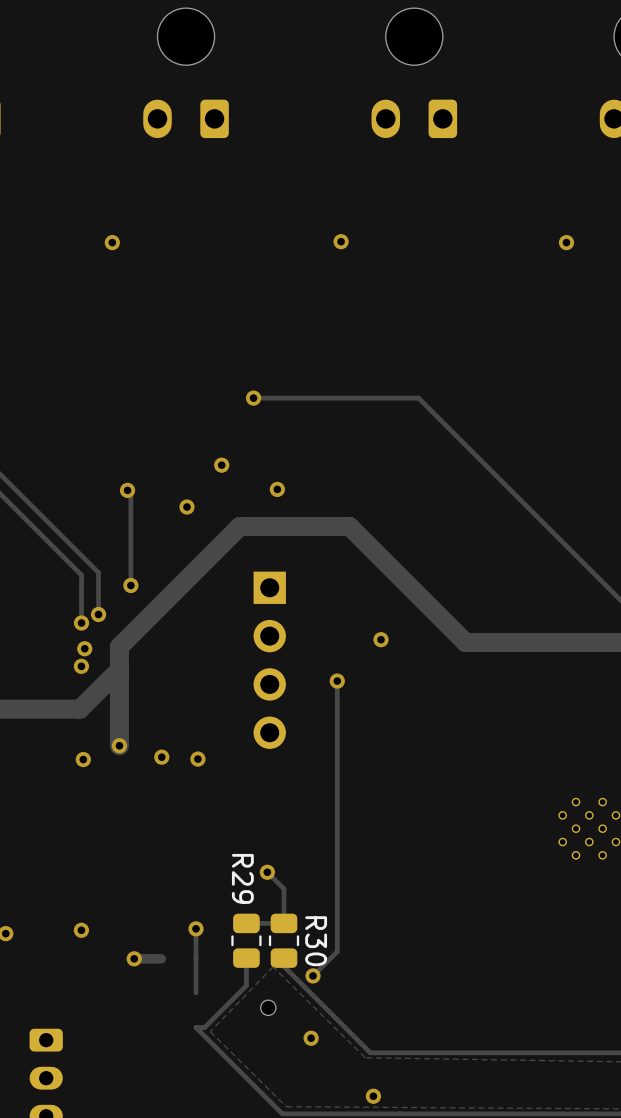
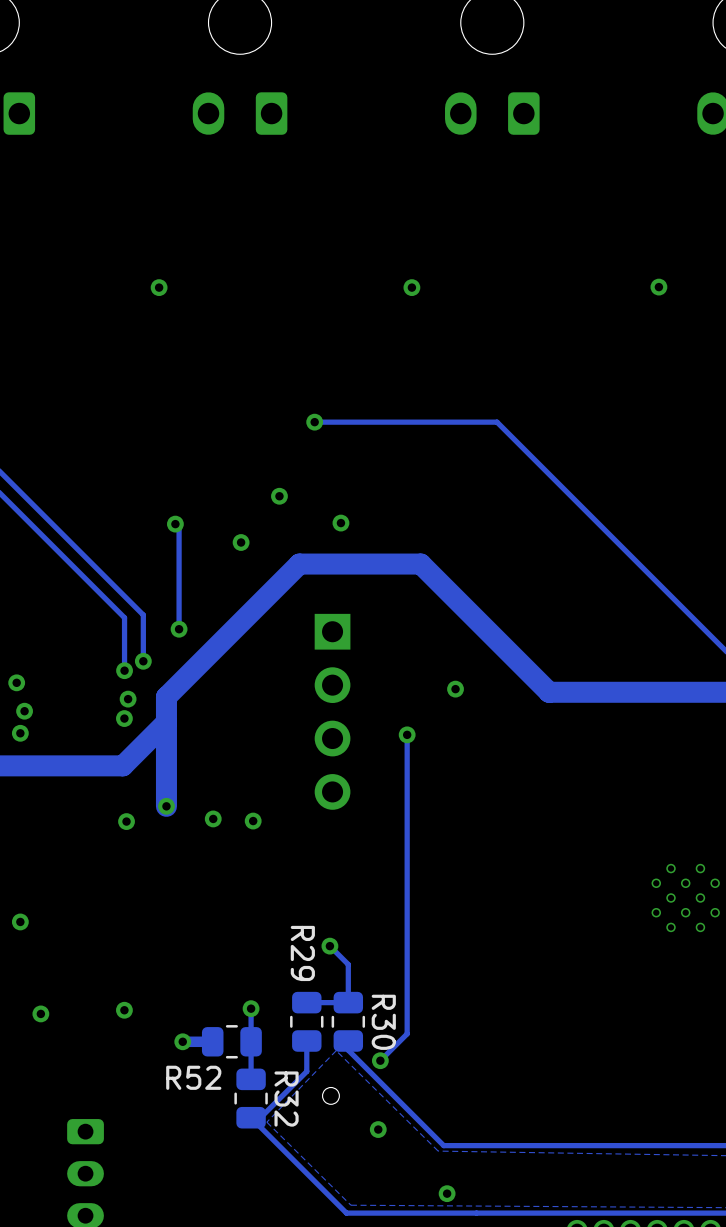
via position: (341, 241) -> (411, 287)
via position: (112, 242) -> (159, 287)
via position: (566, 242) -> (658, 287)
R52: none -> (231, 1041)
R32: none -> (251, 1098)

